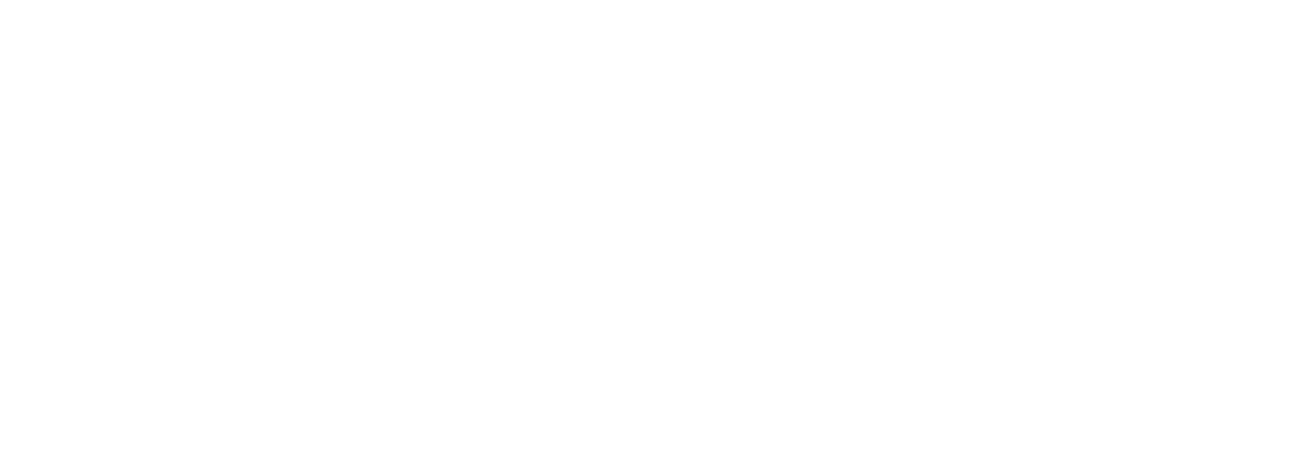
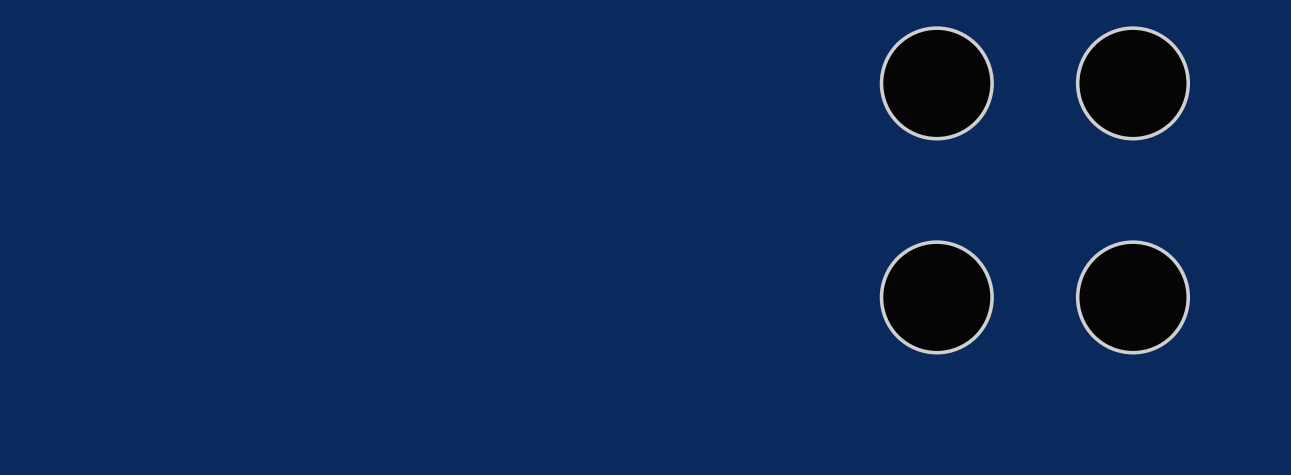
part: none -> (936, 83)
part: none -> (1132, 83)
part: none -> (936, 297)
part: none -> (1132, 297)

